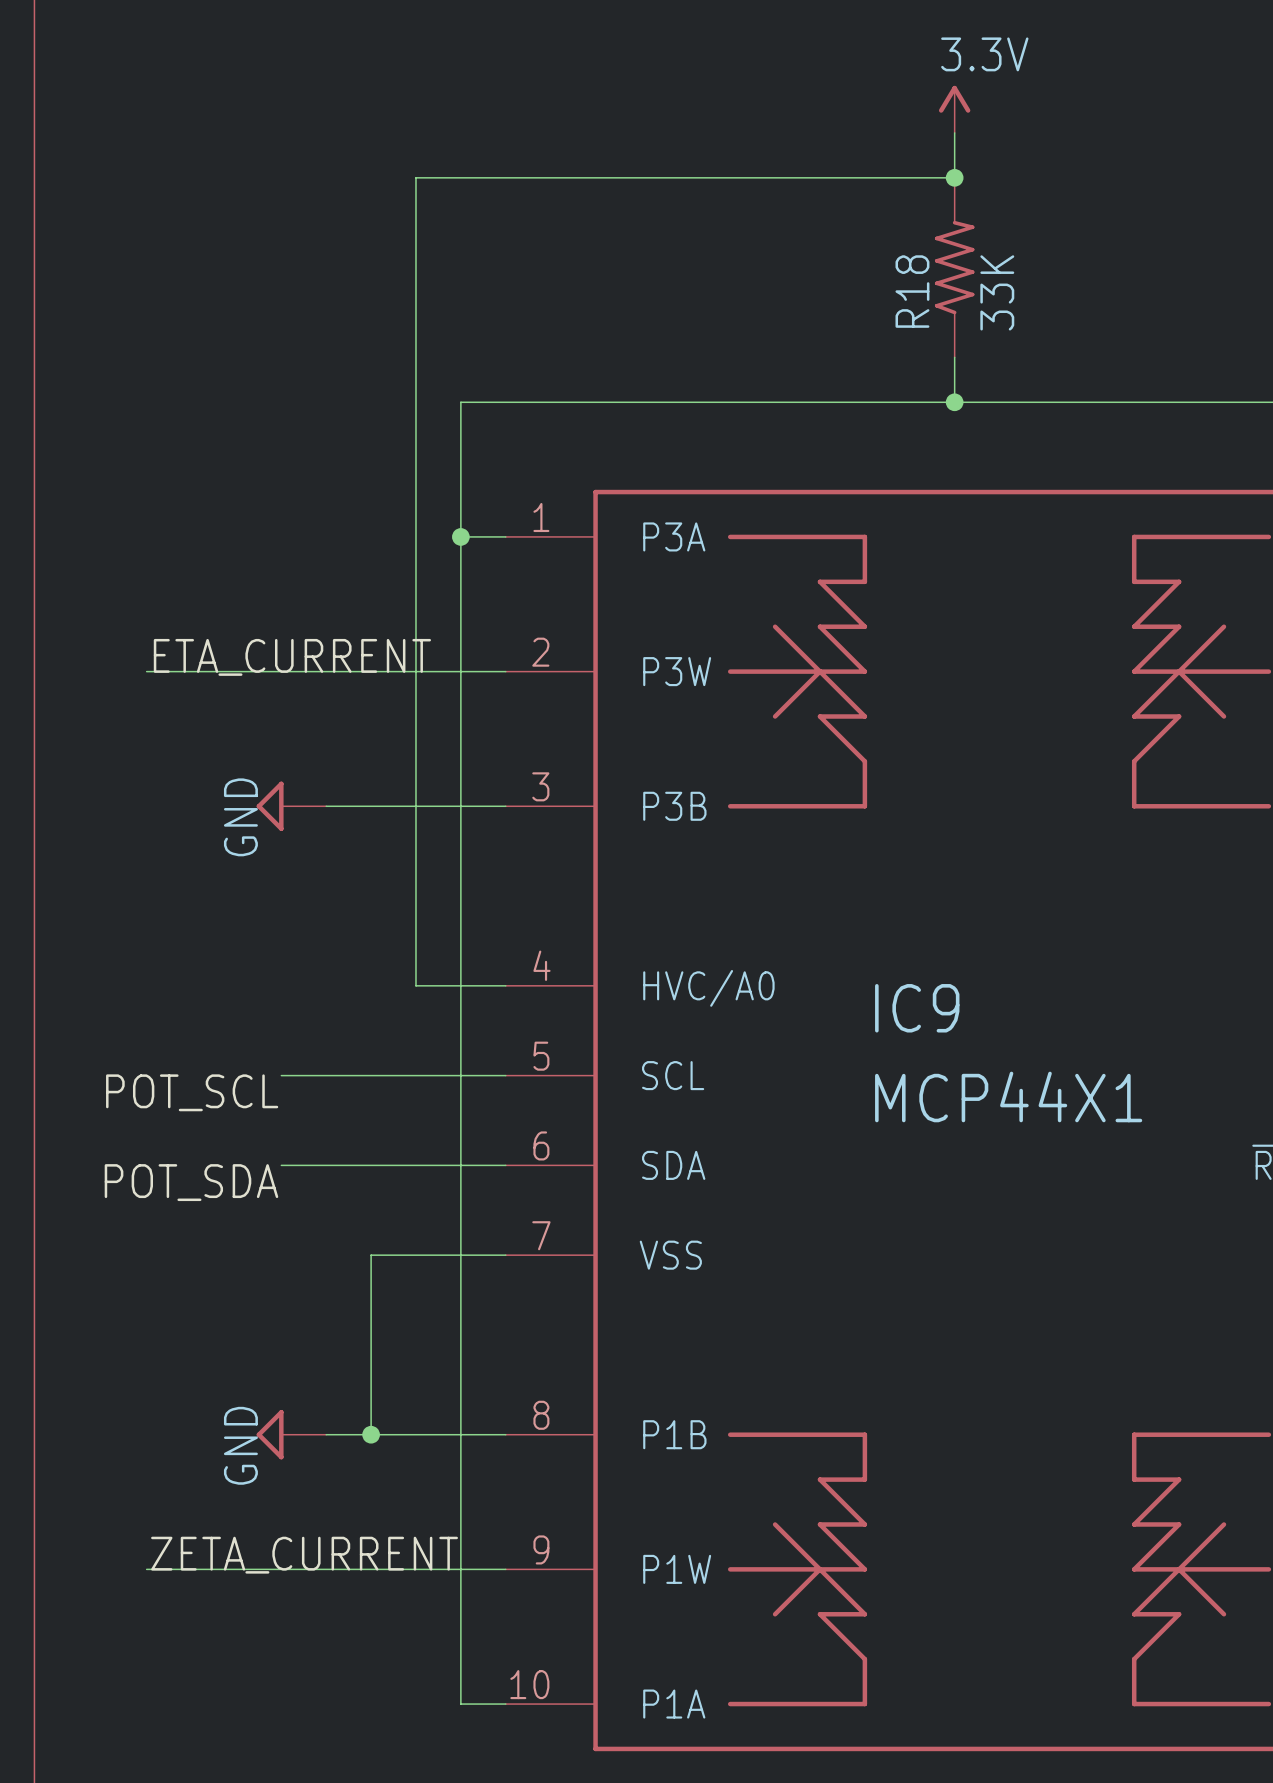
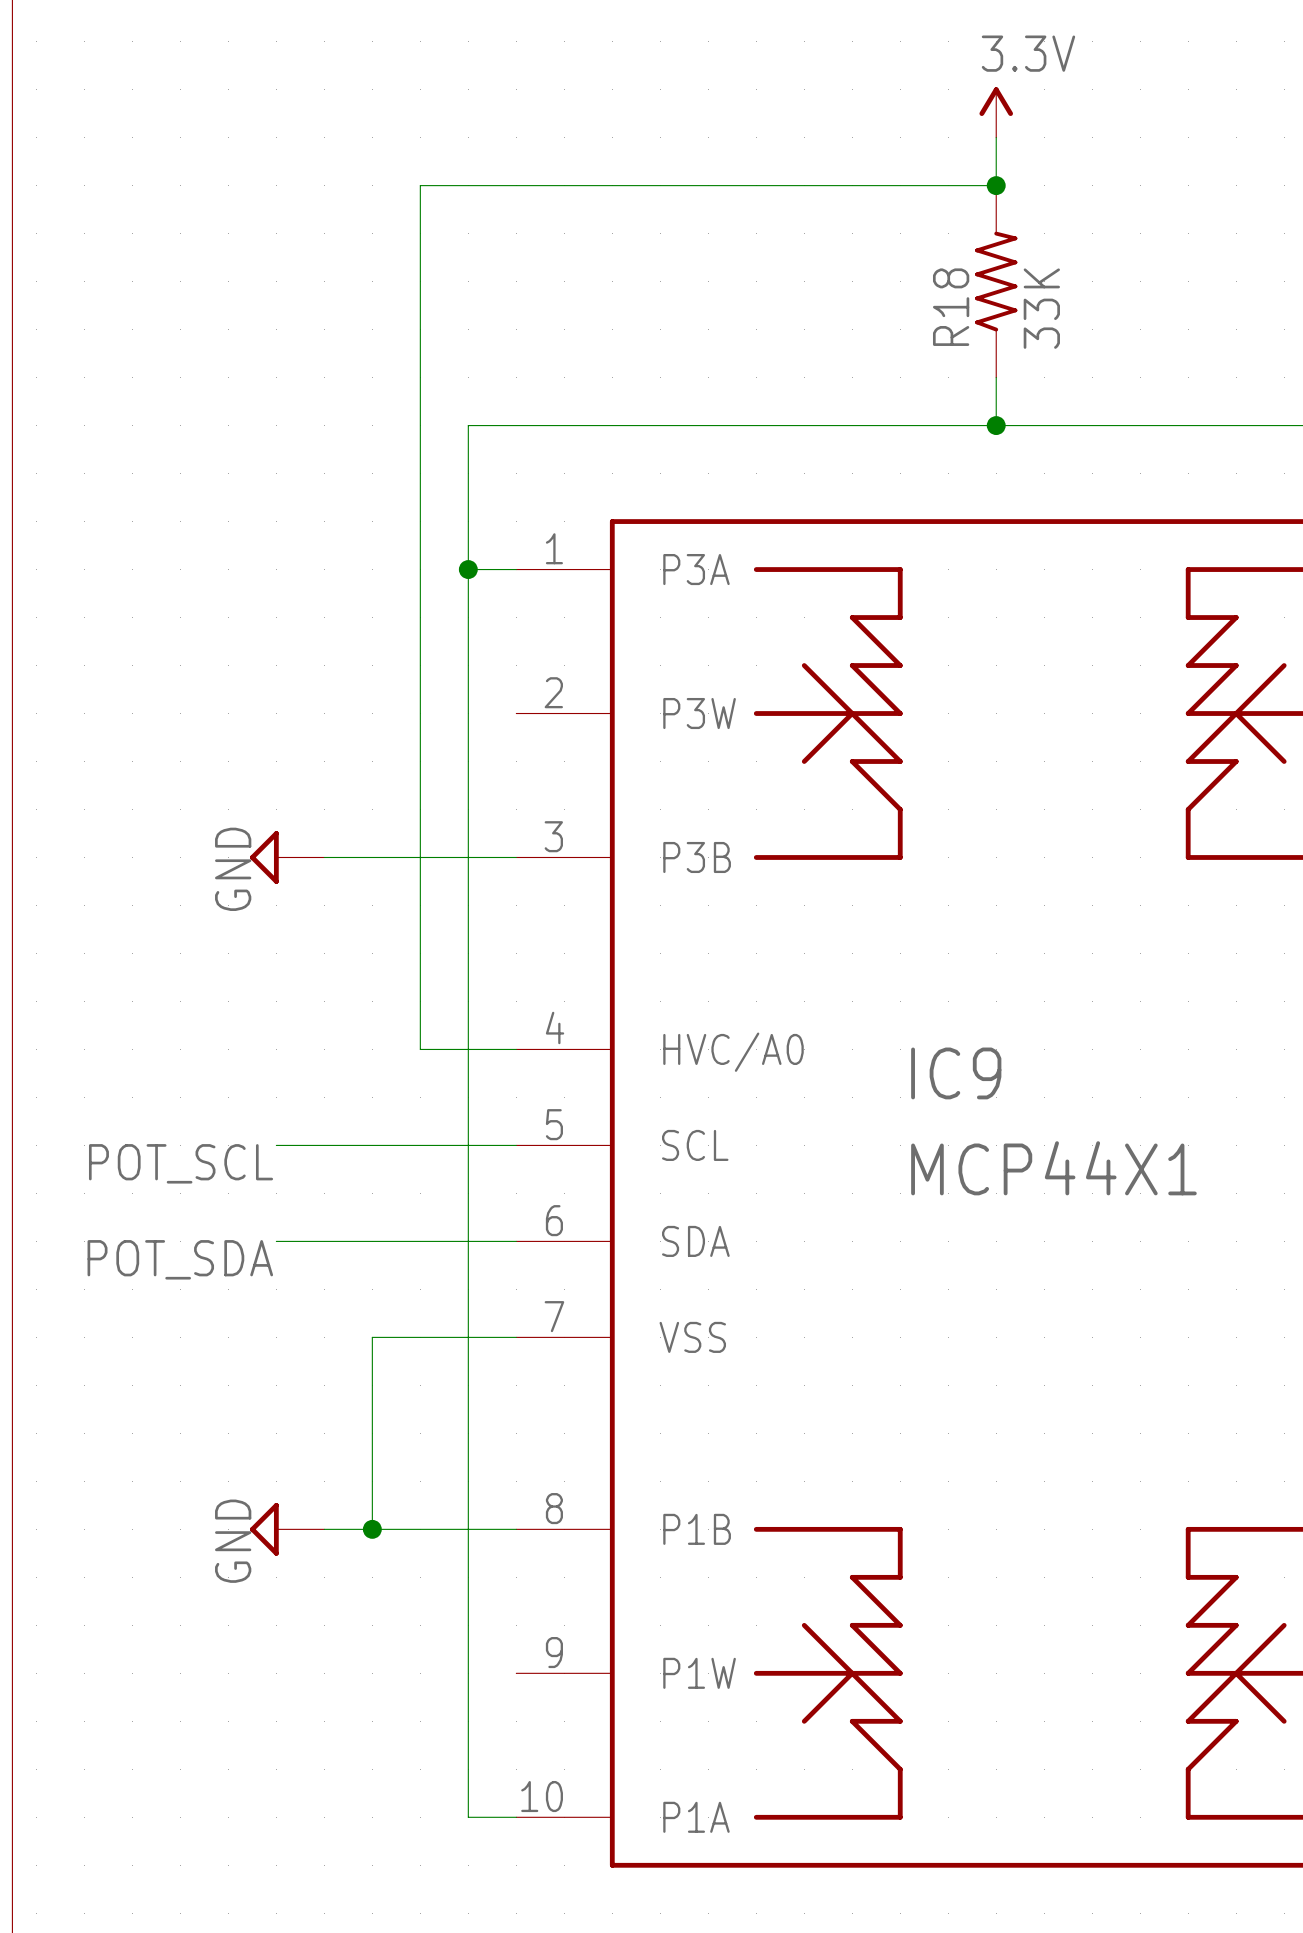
label: ETA_CURRENT (292, 657) -> none
wire: (146, 671) (505, 671) -> none
label: ZETA_CURRENT (304, 1555) -> none
wire: (146, 1569) (505, 1569) -> none

